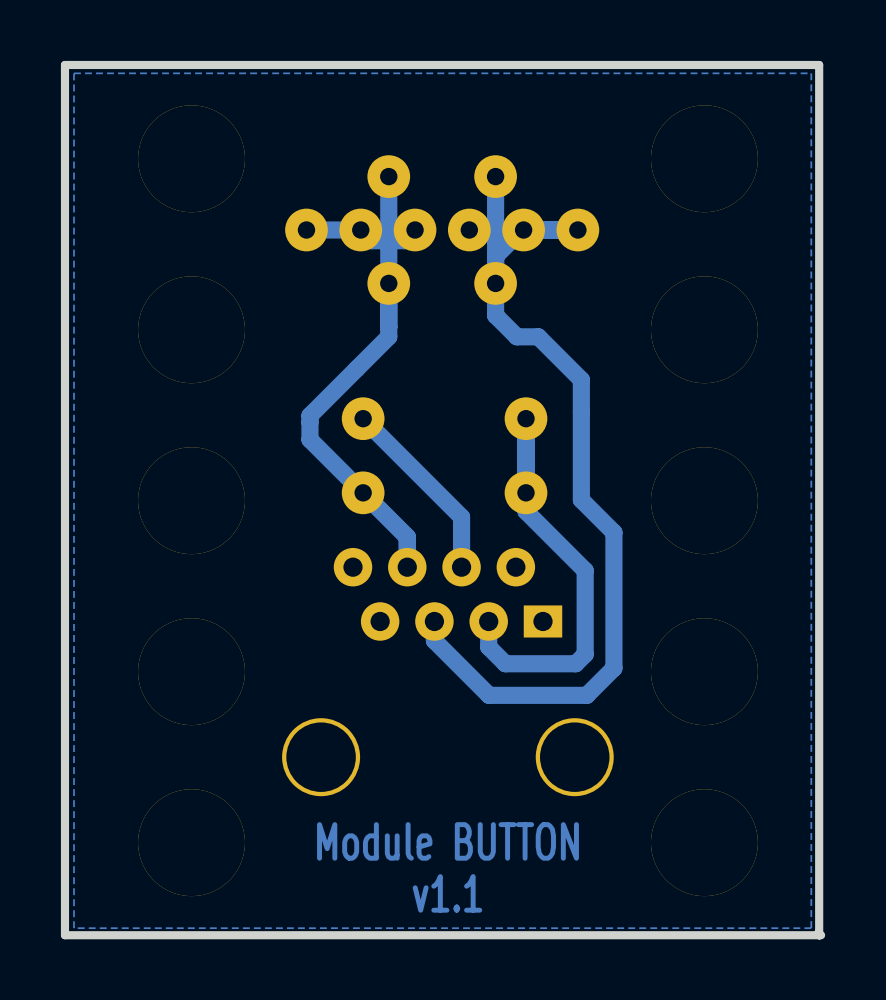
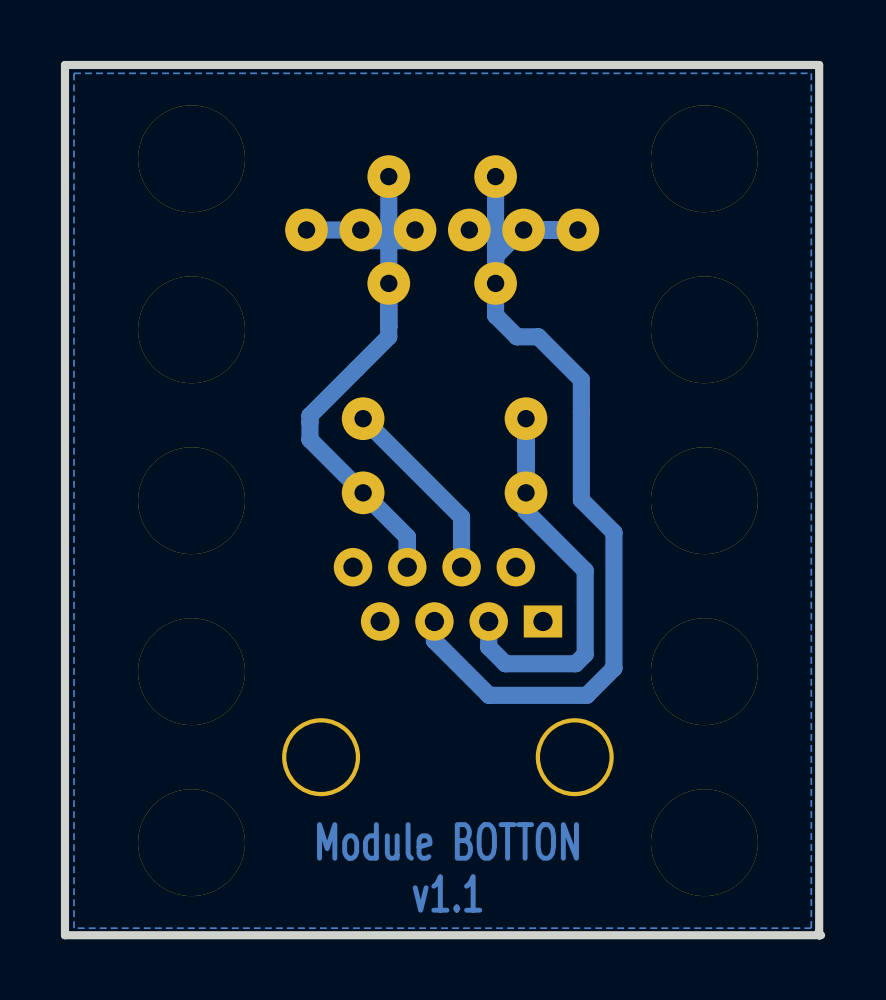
text: Module BUTTON (447, 841) -> Module BOTTON (447, 841)

